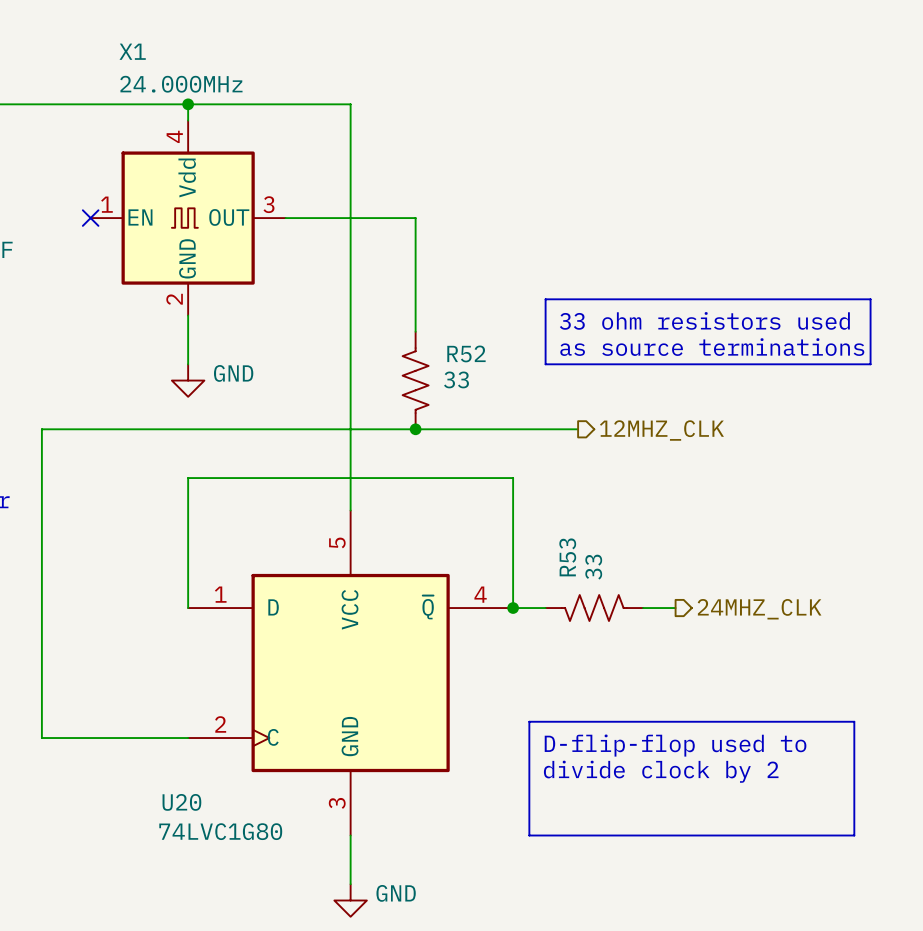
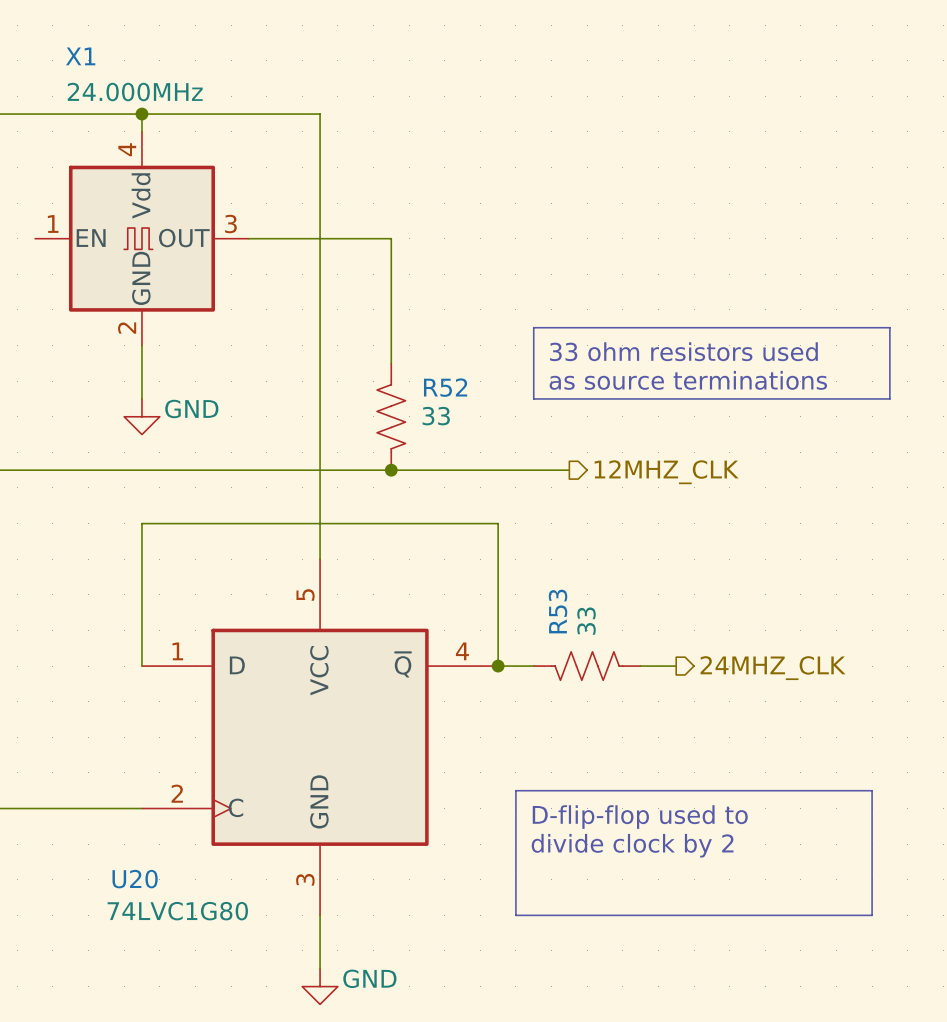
no-connect mark: (90, 218) -> none

